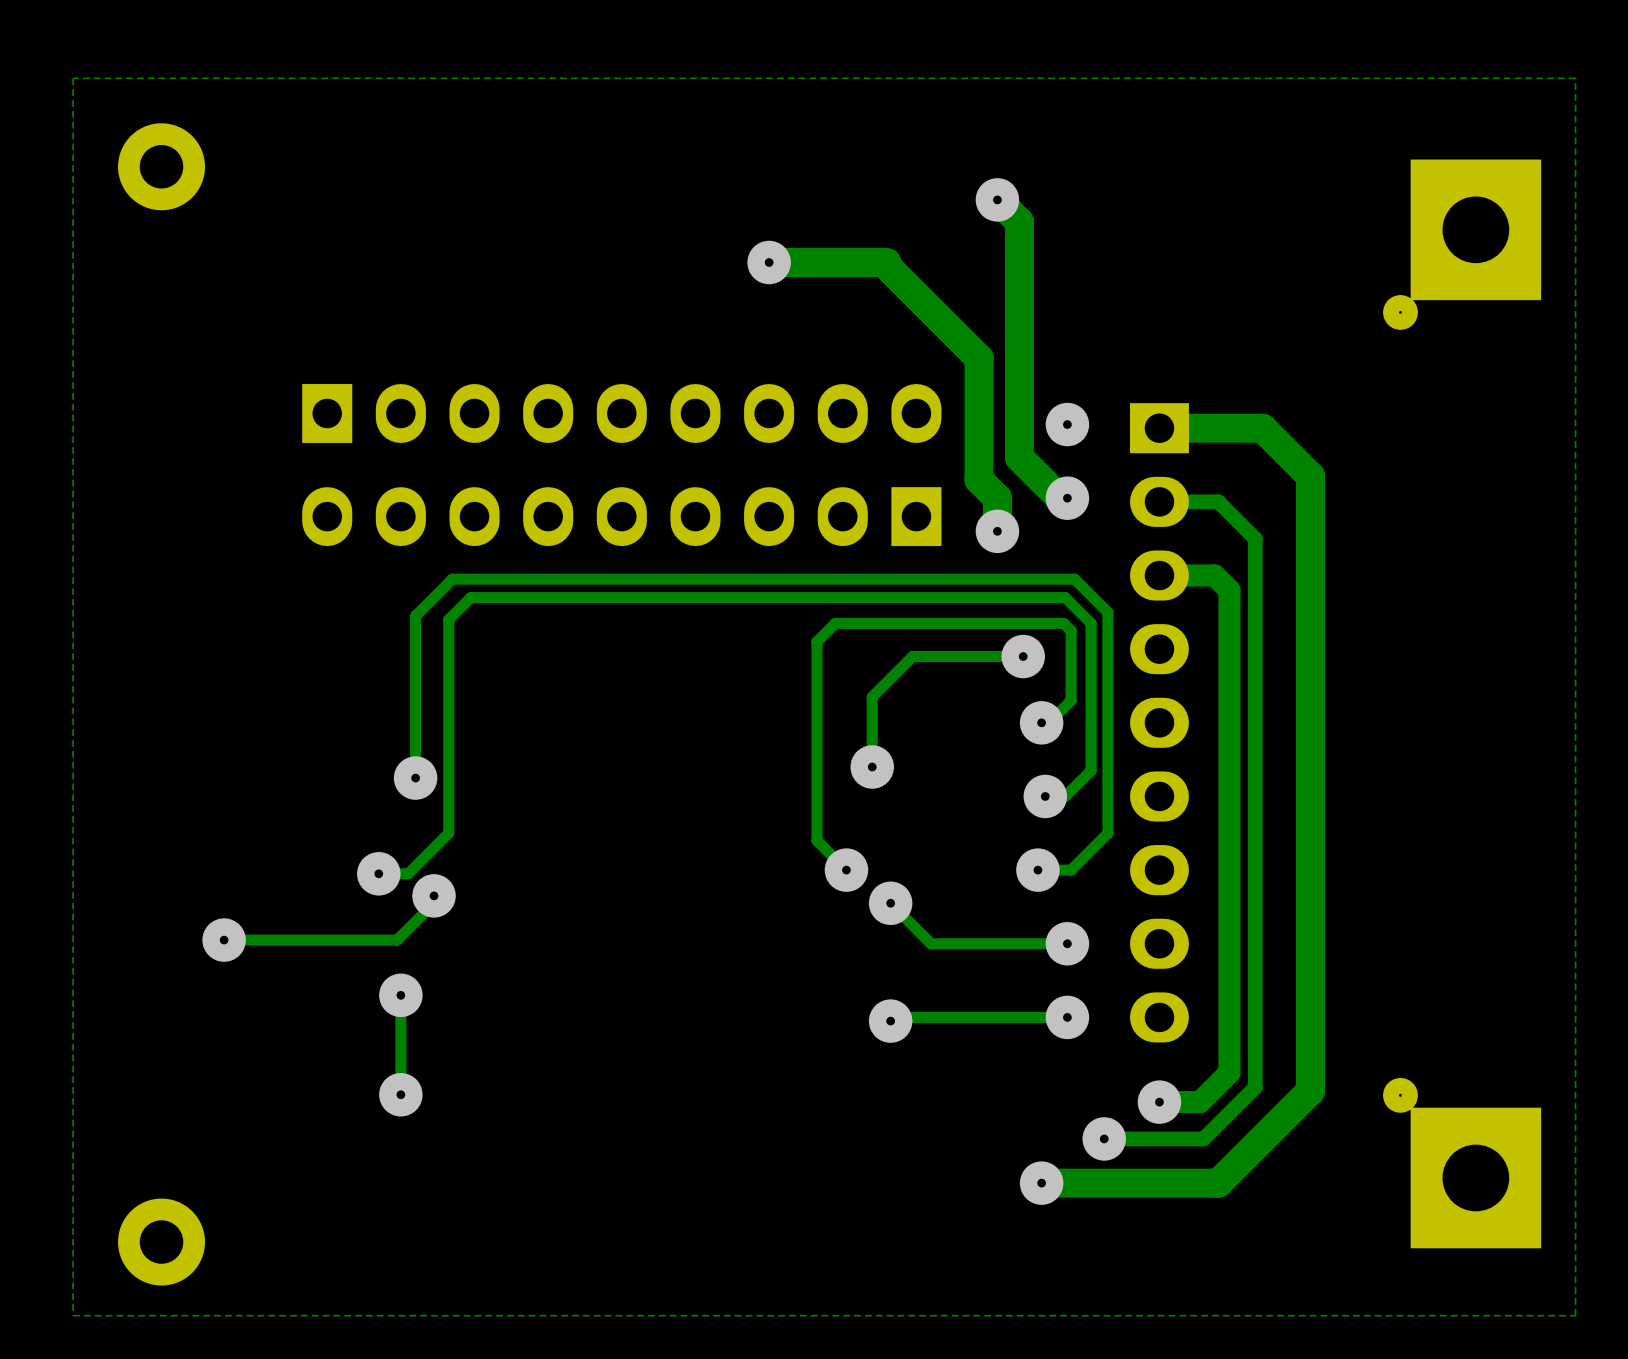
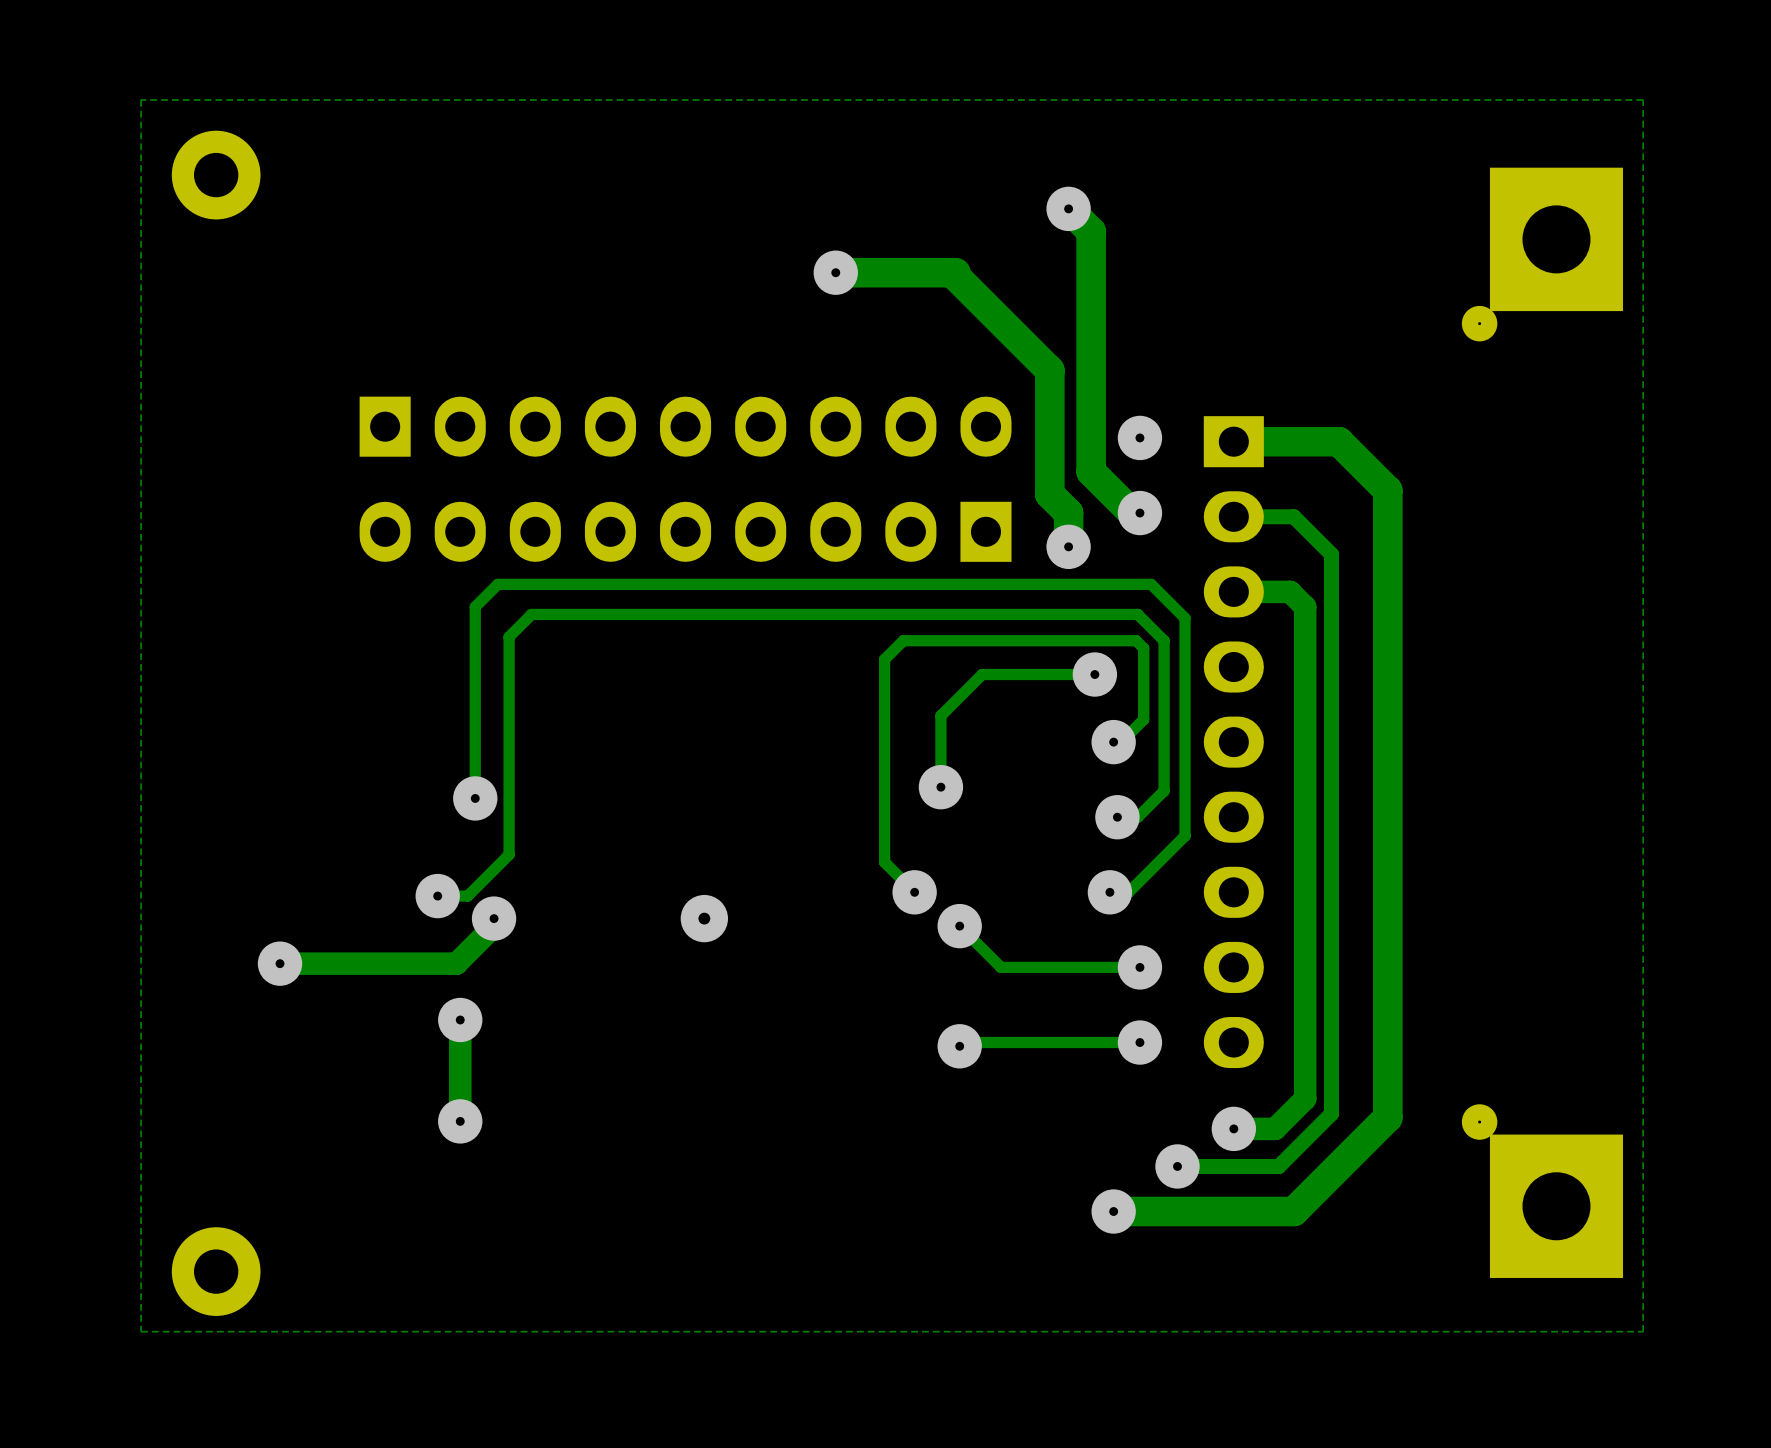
zone outline: (1575, 78) (1575, 1315) (73, 1315) (73, 78) (1575, 78) -> (1643, 99) (1643, 1331) (141, 1331) (141, 99) (1643, 99)
track: (415, 616) (452, 579) (1074, 579) (1107, 612) (1107, 833) (1071, 870) (1056, 870) -> (475, 633) (475, 606) (497, 584) (1151, 584) (1185, 618) (1185, 835) (1128, 892)
track width: thin (434, 895) (434, 903) (397, 940) (224, 940) -> thick (494, 918) (494, 926) (456, 963) (280, 963)
via: none -> (704, 918)
track width: thin (400, 995) (400, 1098) -> thick (460, 1019) (460, 1125)

